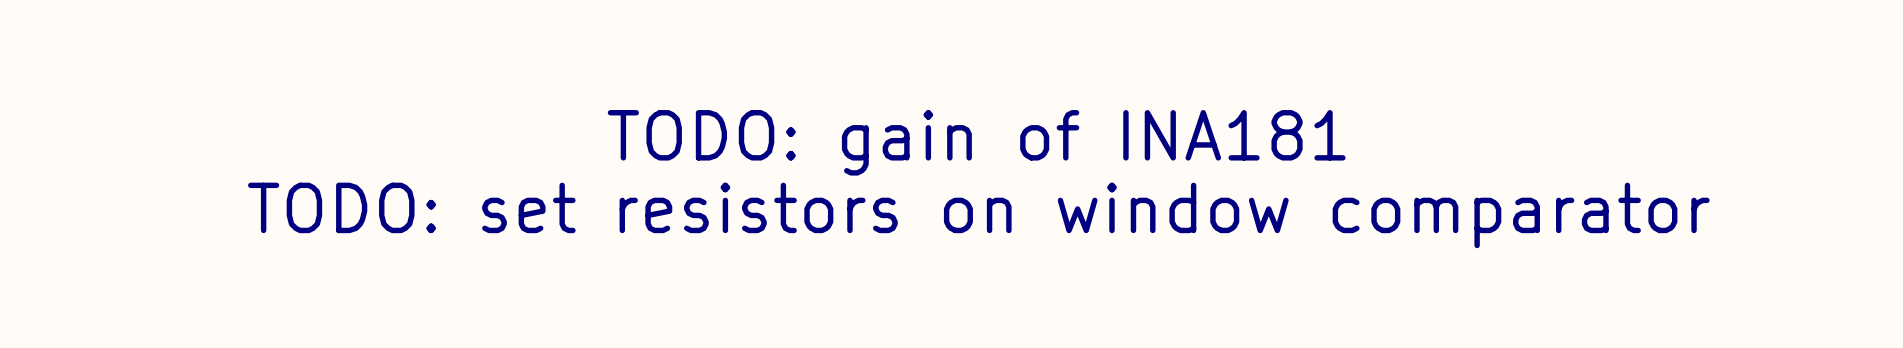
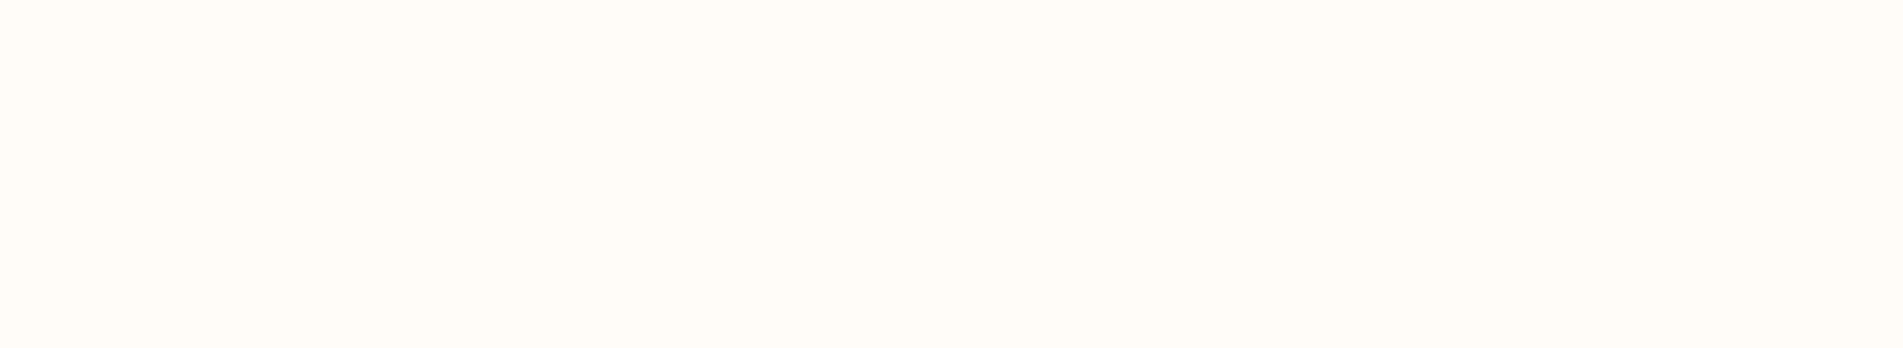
text: TODO: gain of INA181 (976, 142) -> none
text: TODO: set resistors on window comparator (978, 215) -> none

